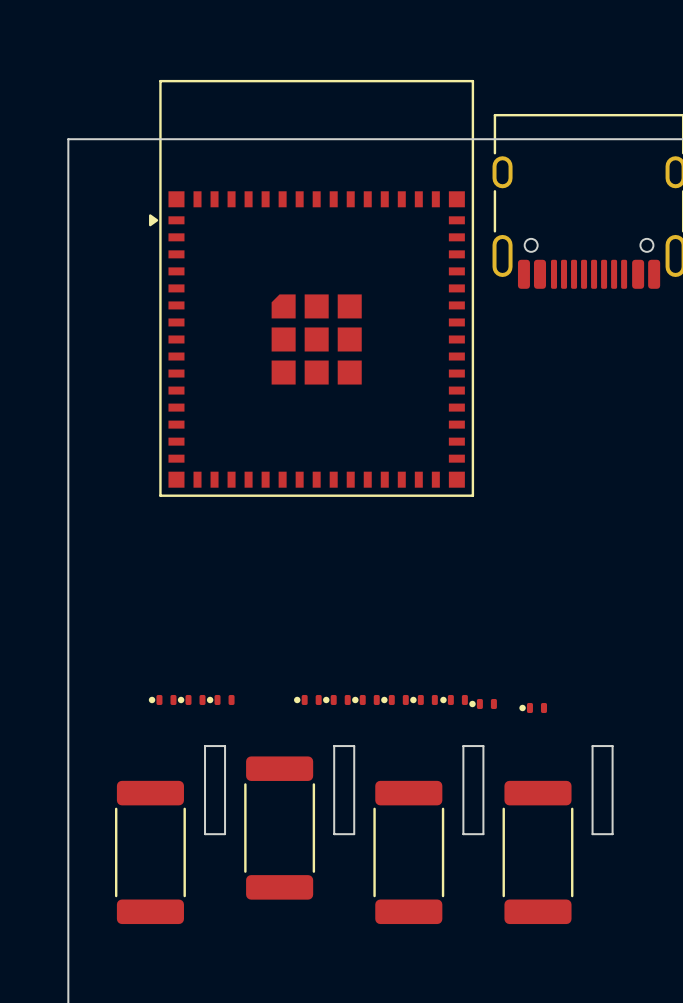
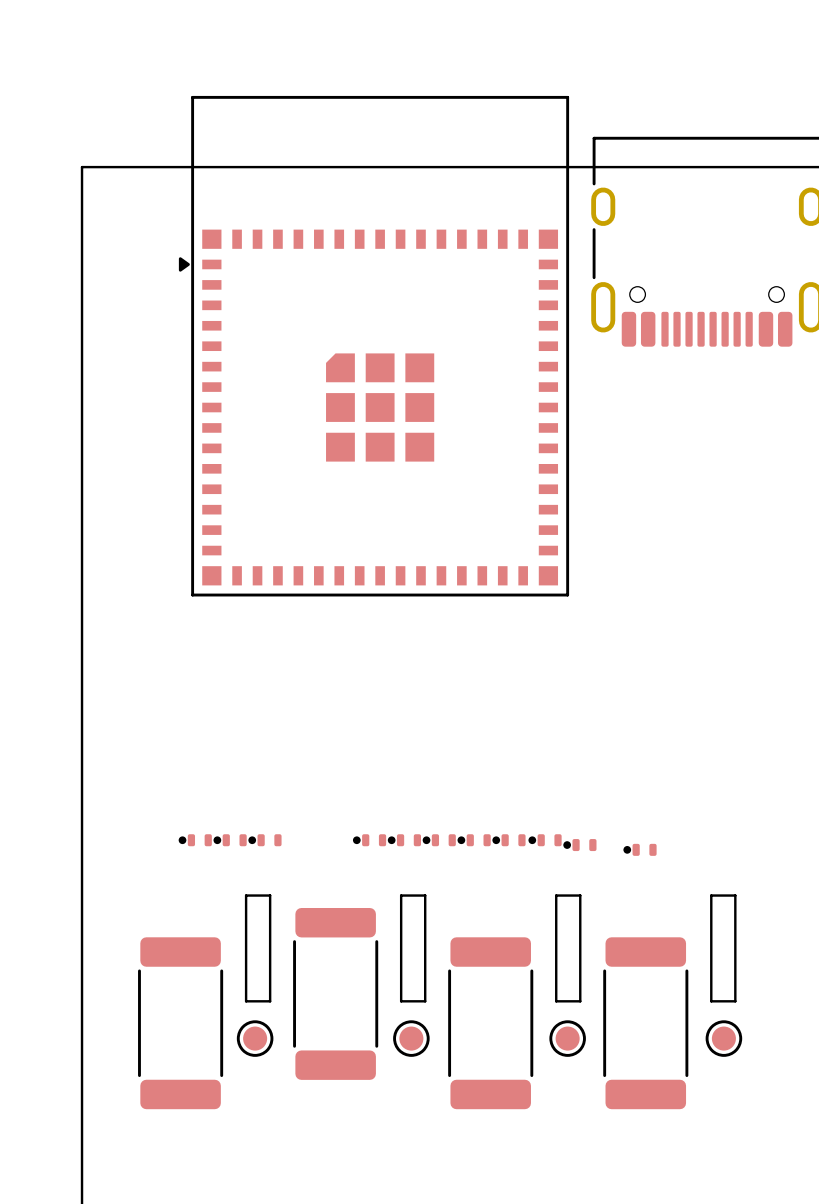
part: none -> (255, 1038)
part: none -> (411, 1038)
part: none -> (567, 1038)
part: none -> (723, 1038)

